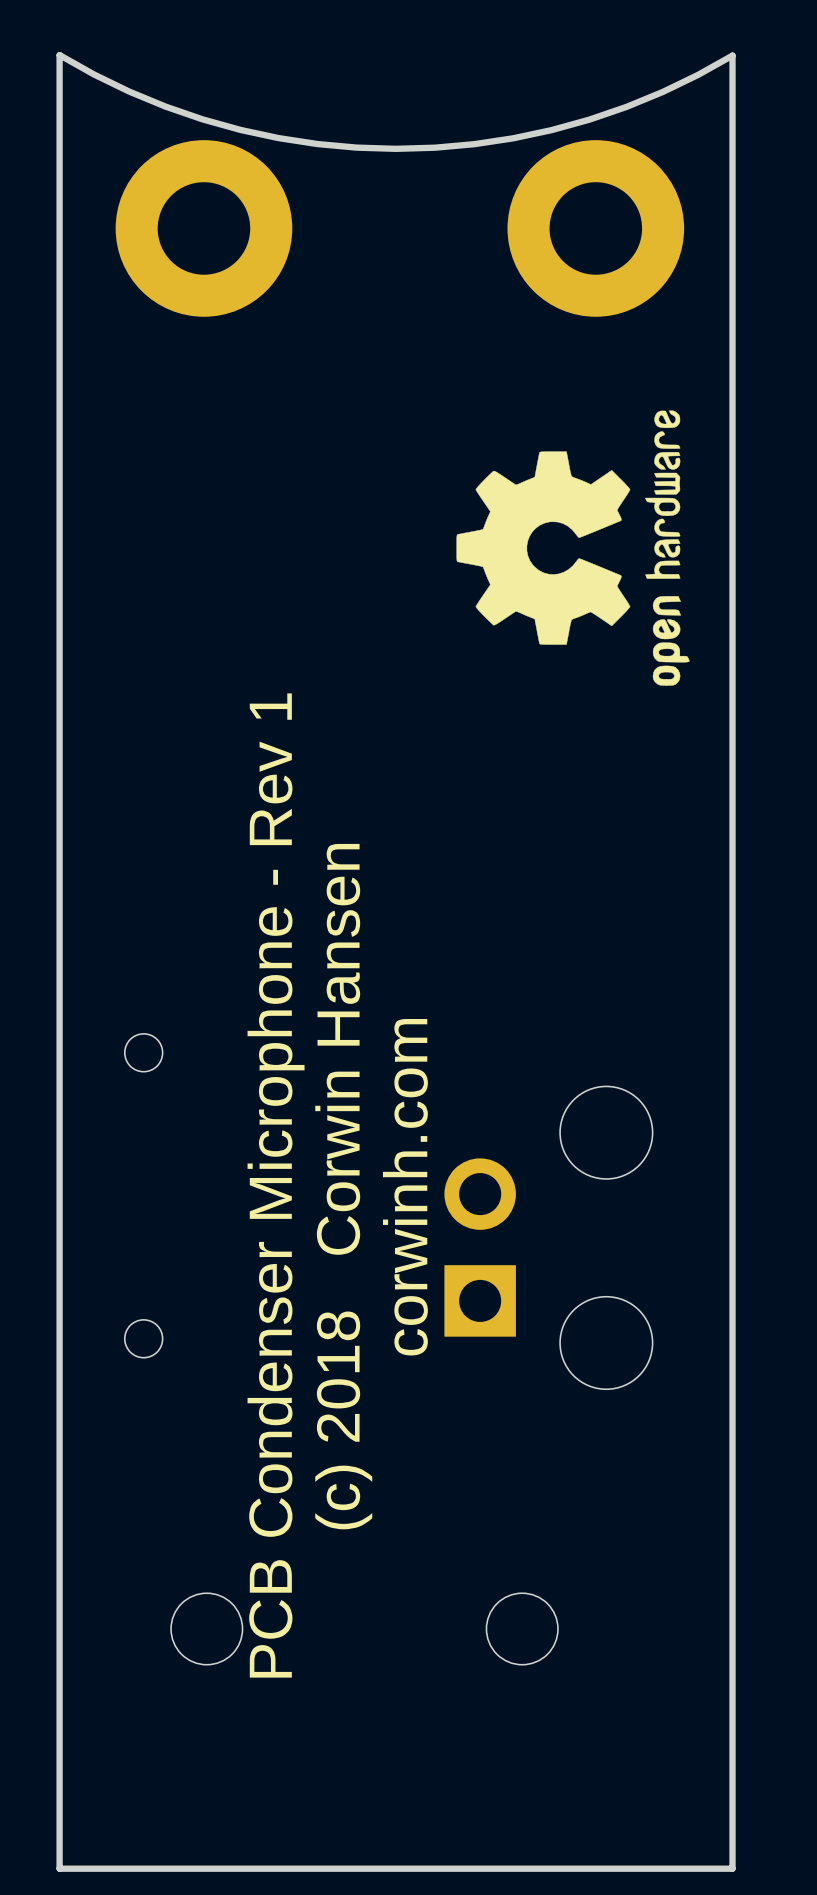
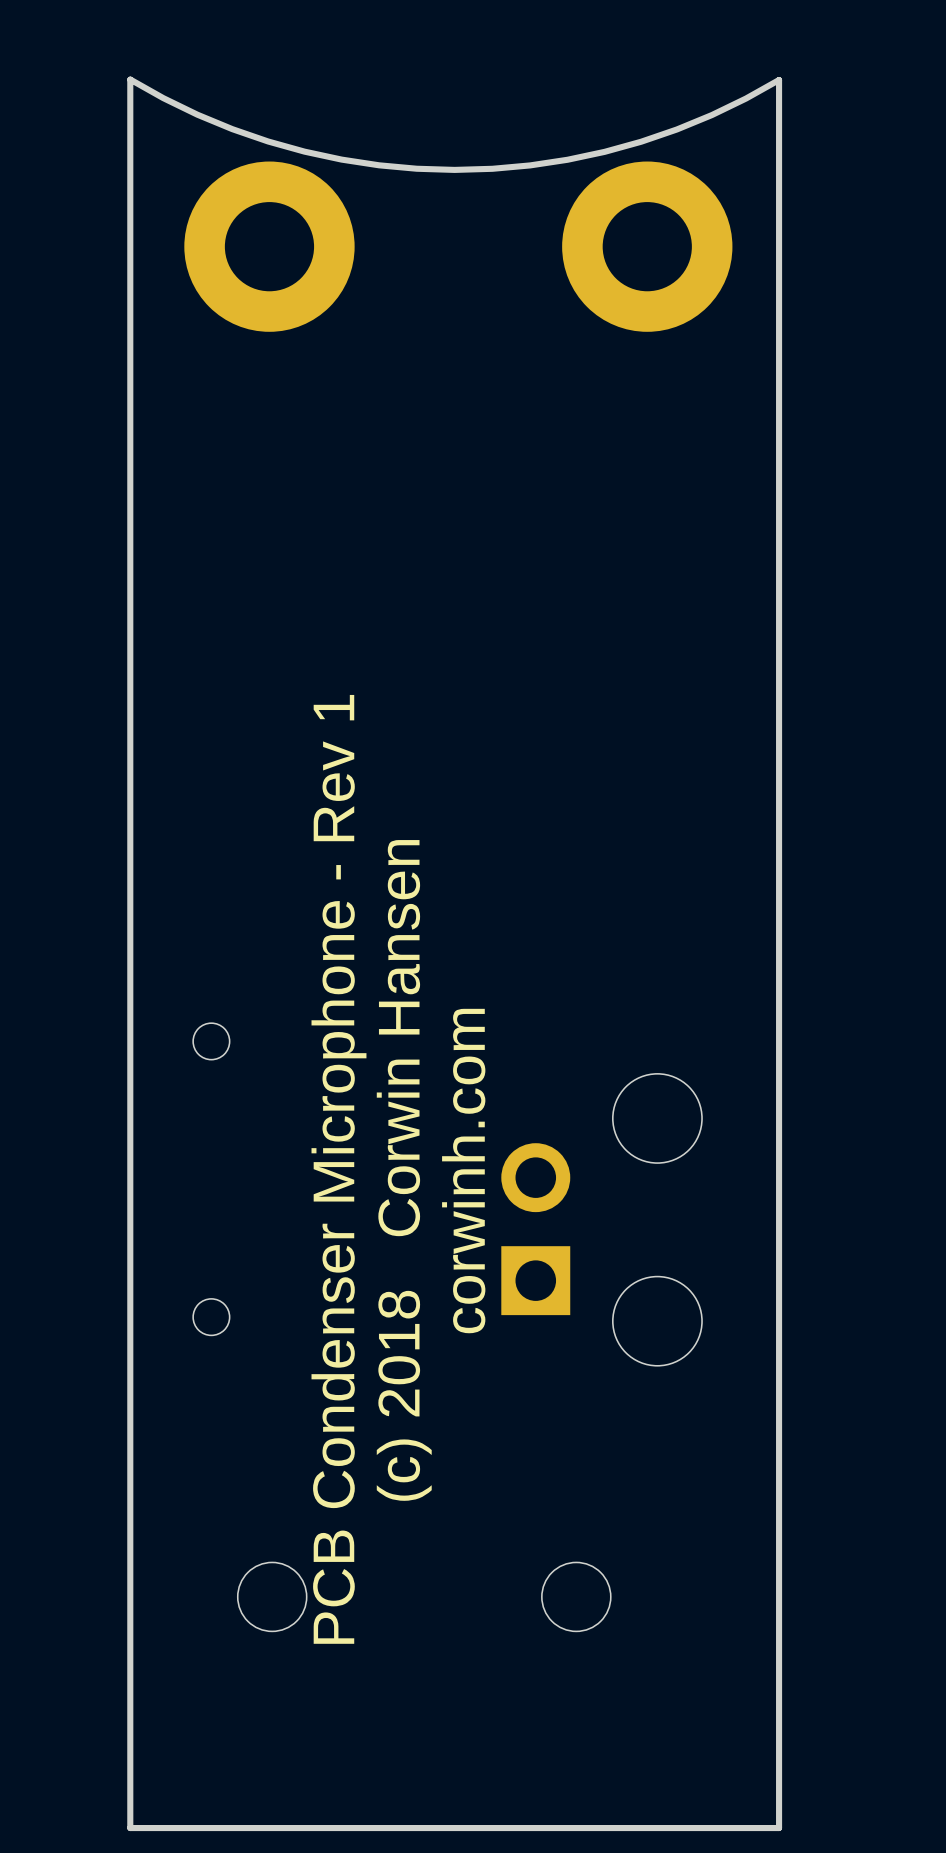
drawing: [456, 410, 690, 686] -> none

